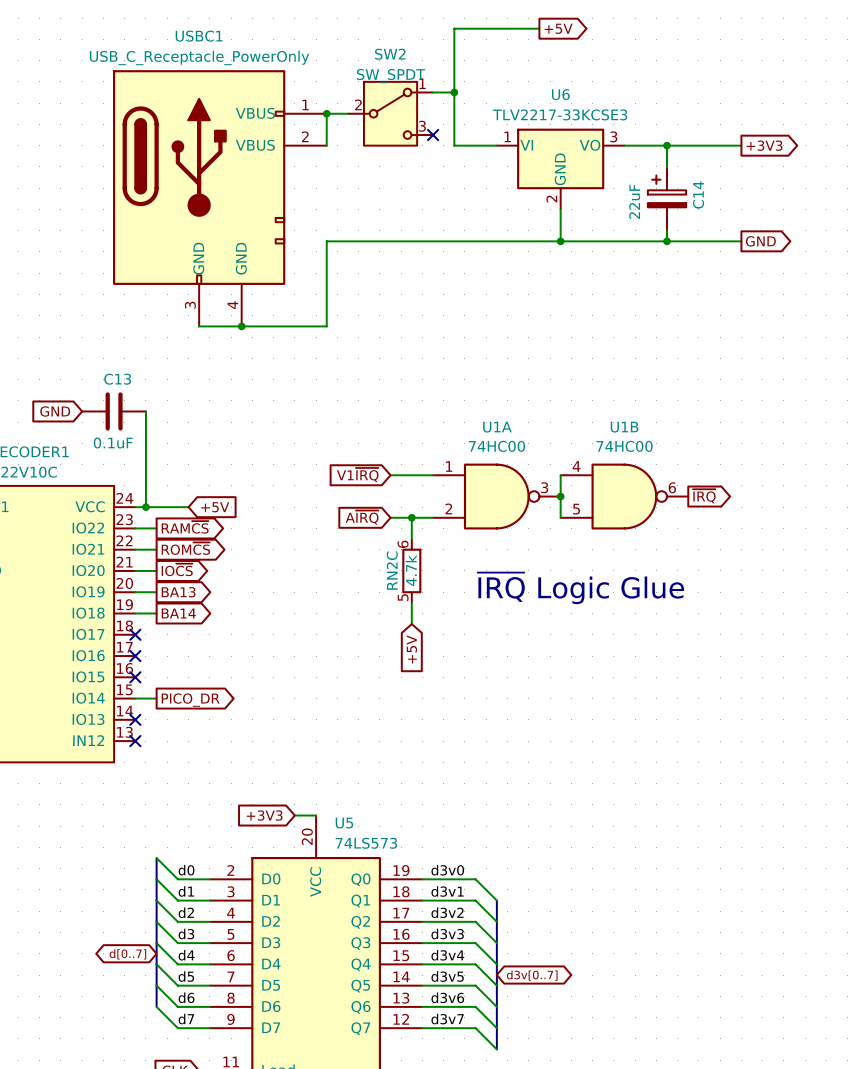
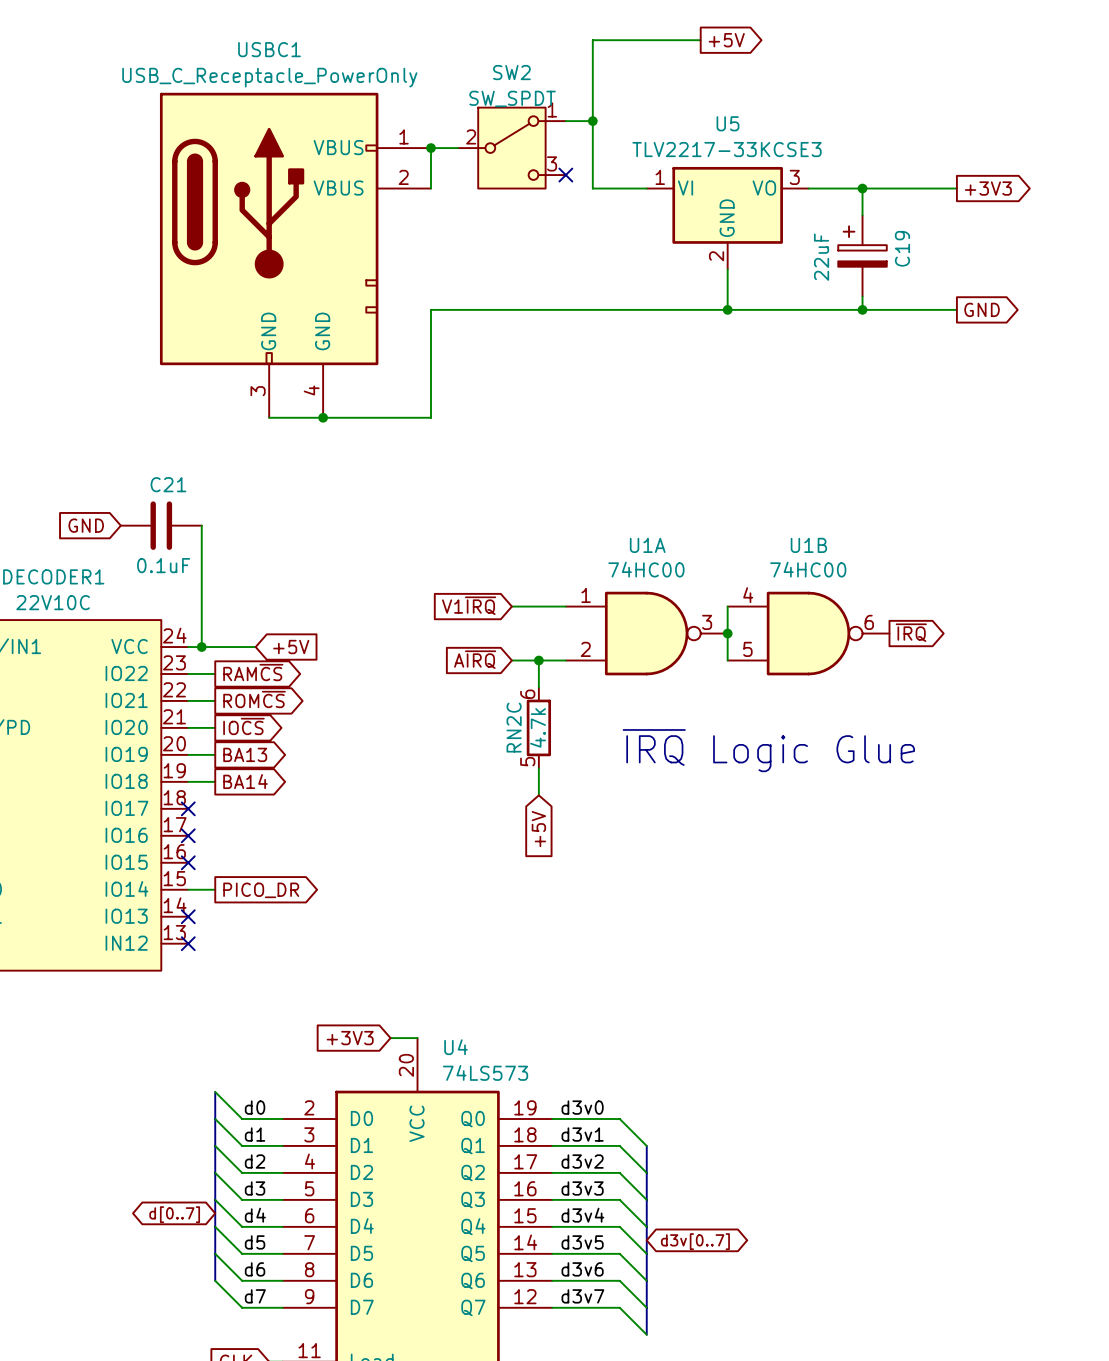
U6 name: U6 (560, 94) -> U5 (727, 123)
C14 name: C14 (698, 195) -> C19 (902, 248)
C13 name: C13 (117, 379) -> C21 (168, 484)
U5 name: U5 (344, 823) -> U4 (456, 1047)

